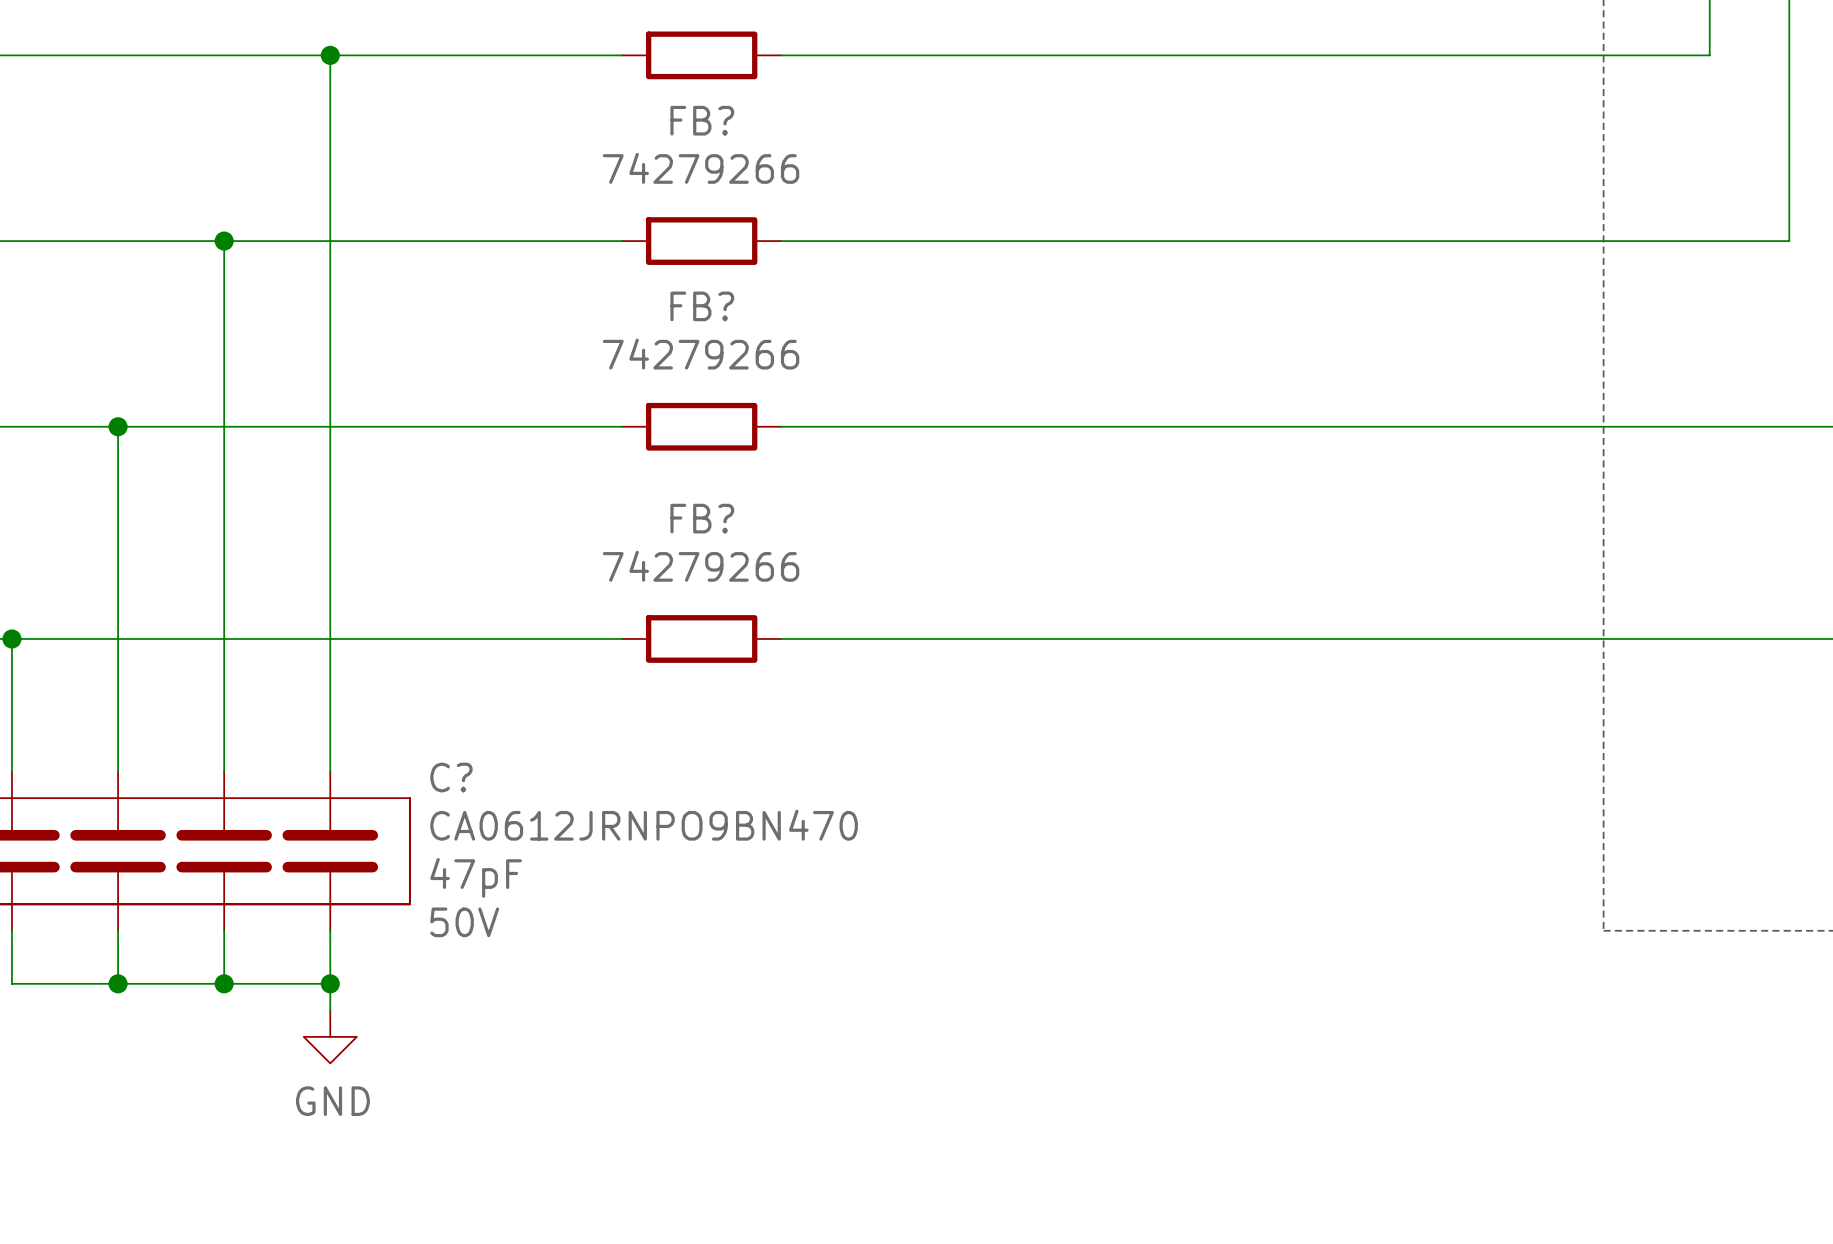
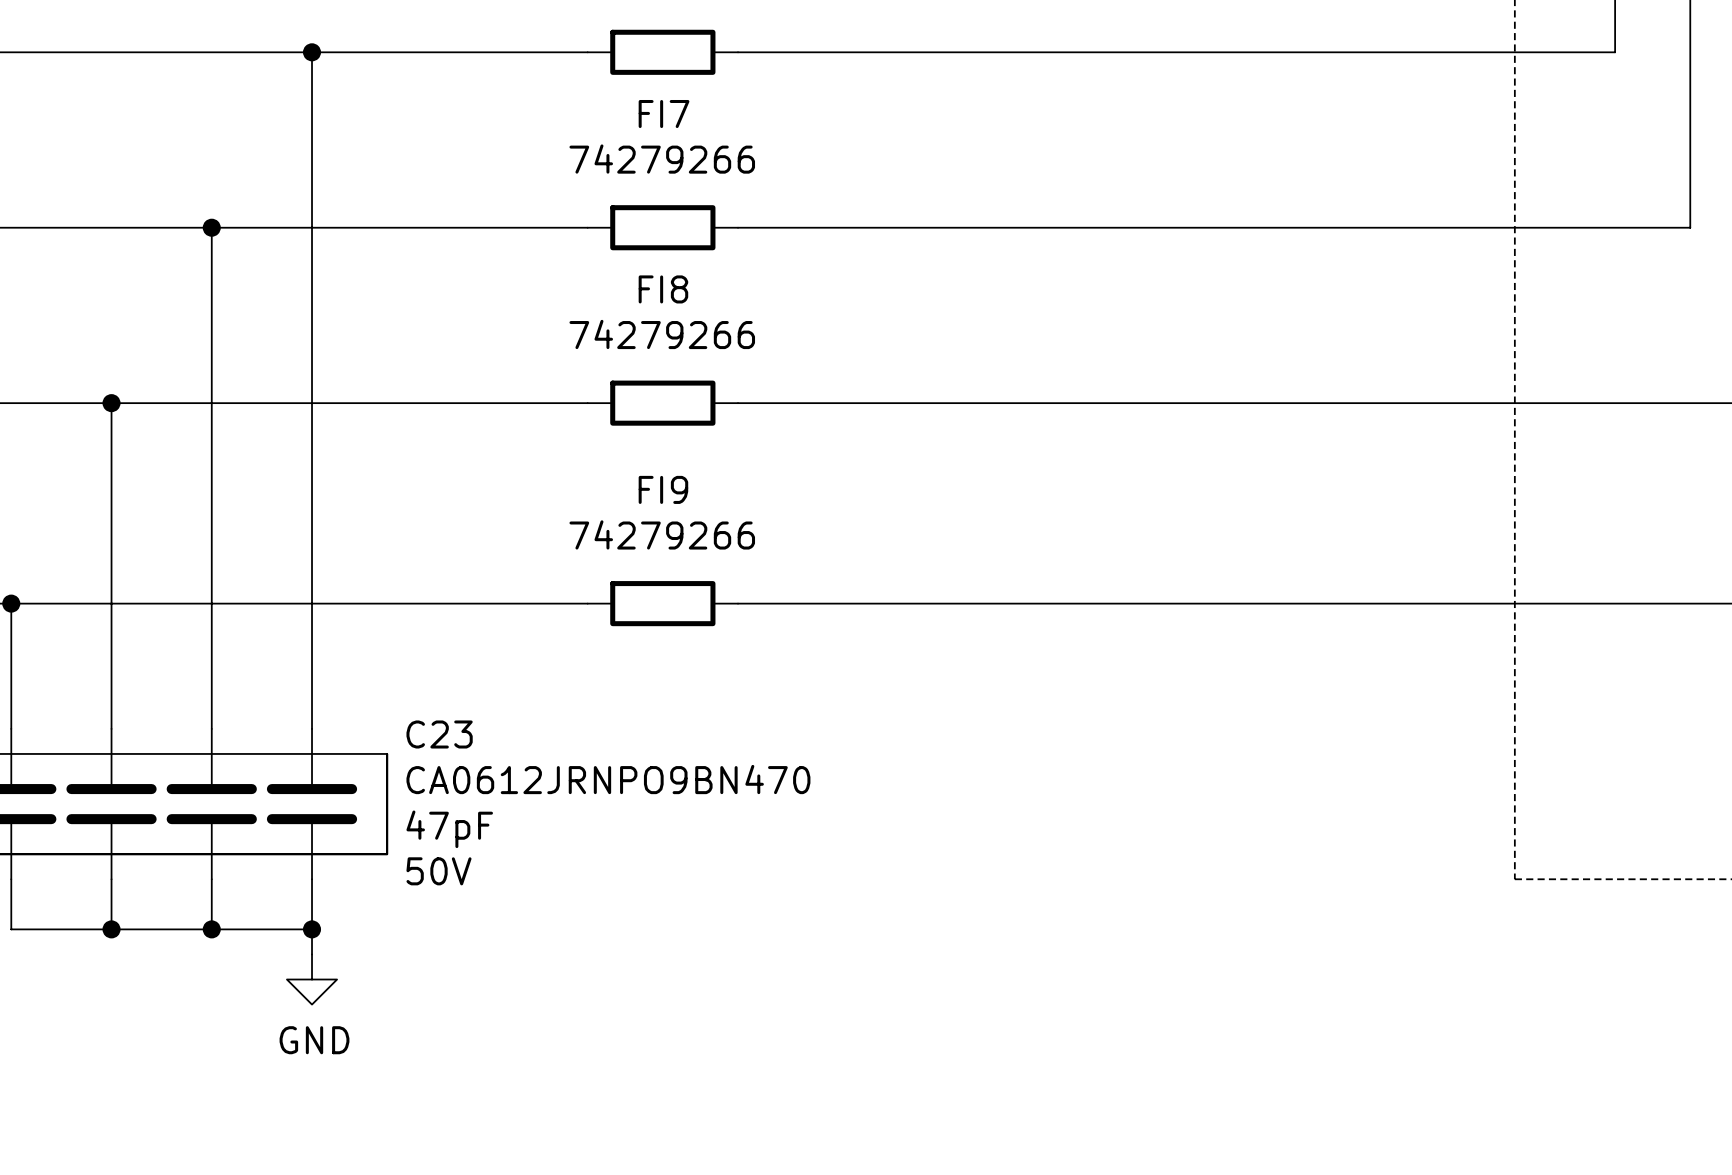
FB? name: FB? (702, 120) -> FI7 (664, 114)
FB? name: FB? (702, 306) -> FI8 (663, 289)
FB? name: FB? (702, 518) -> FI9 (663, 489)
C? name: C? (451, 777) -> C23 (439, 734)

